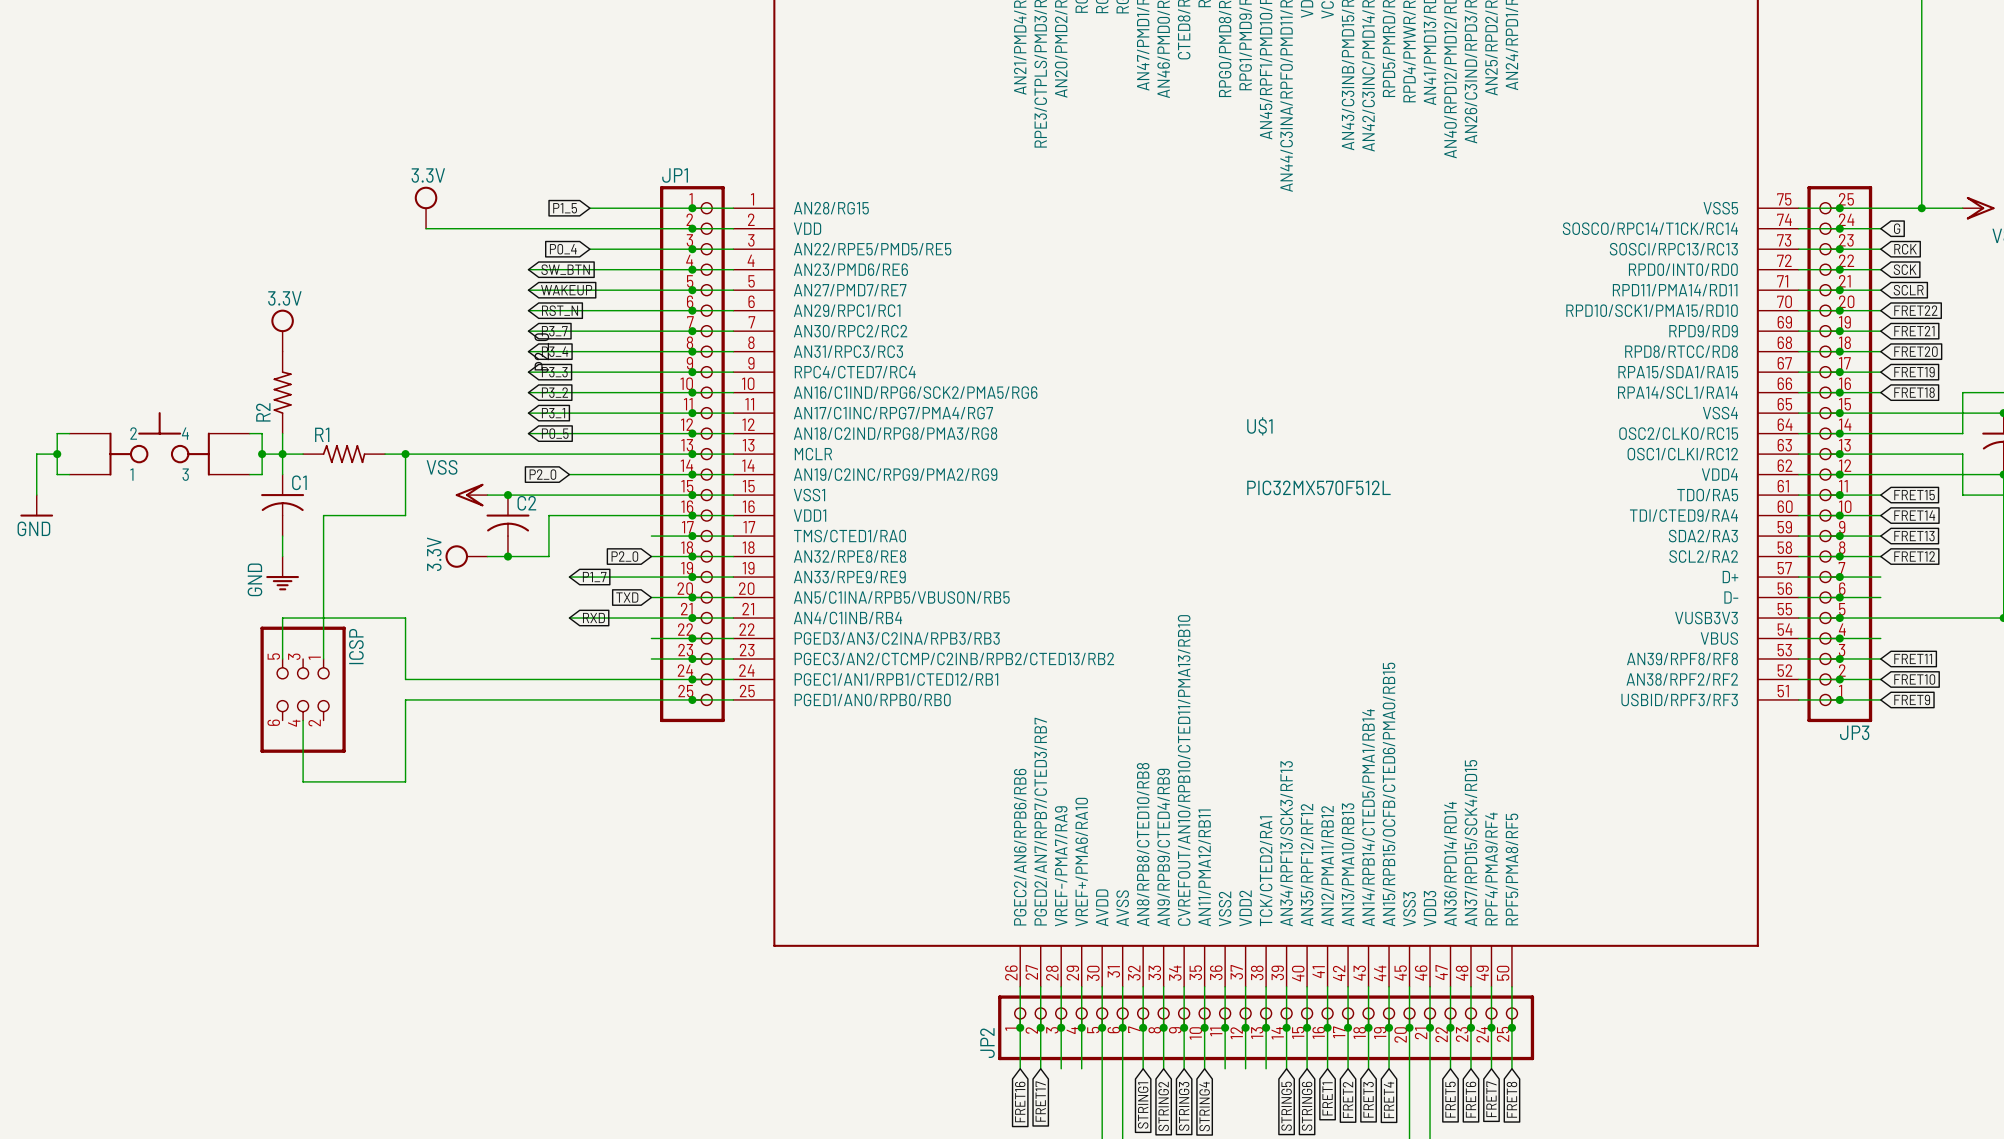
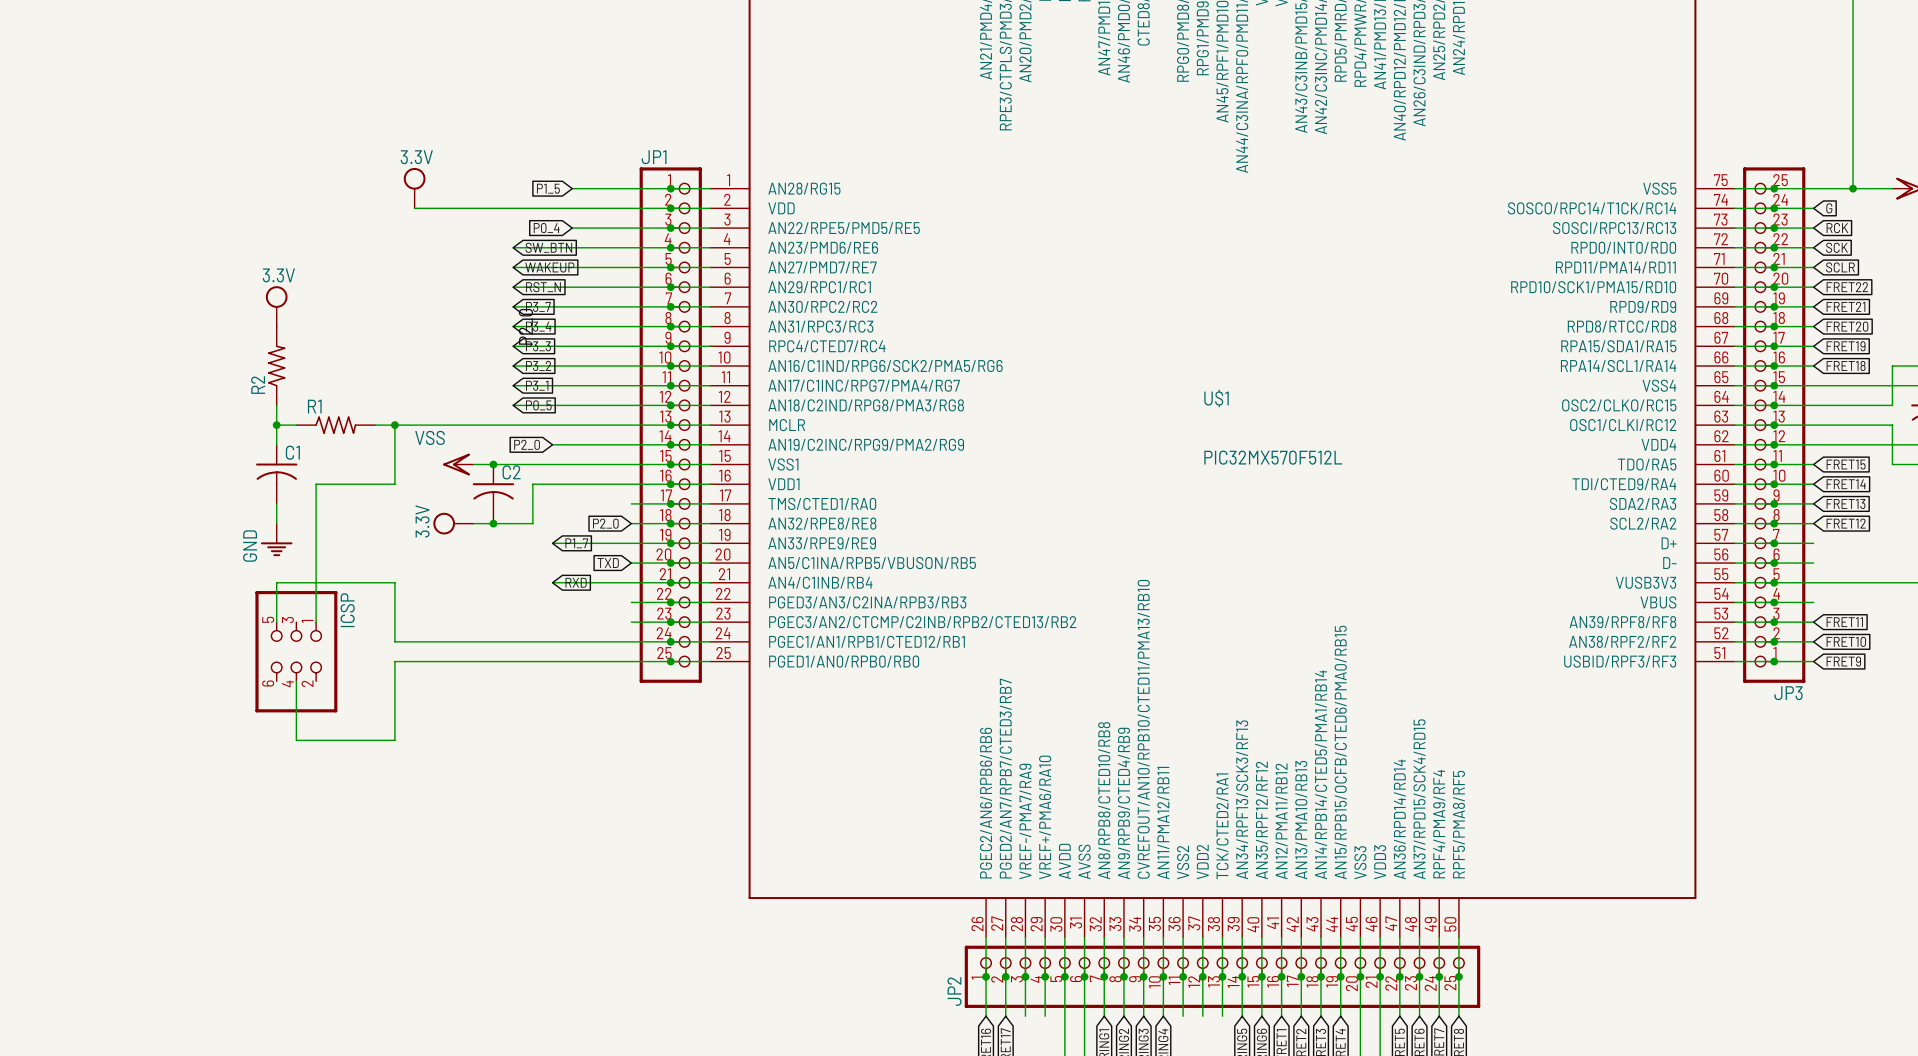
wire: (69, 433) (57, 433) (57, 474) (69, 474) -> none
wire: (249, 433) (262, 433) (262, 474) (249, 474) -> none
part: (159, 443) -> none
wire: (57, 454) (36, 454) (36, 495) -> none
junction: (57, 454) -> none
wire: (262, 454) (282, 454) -> none
junction: (262, 454) -> none
power symbol: GND (36, 505) -> none

